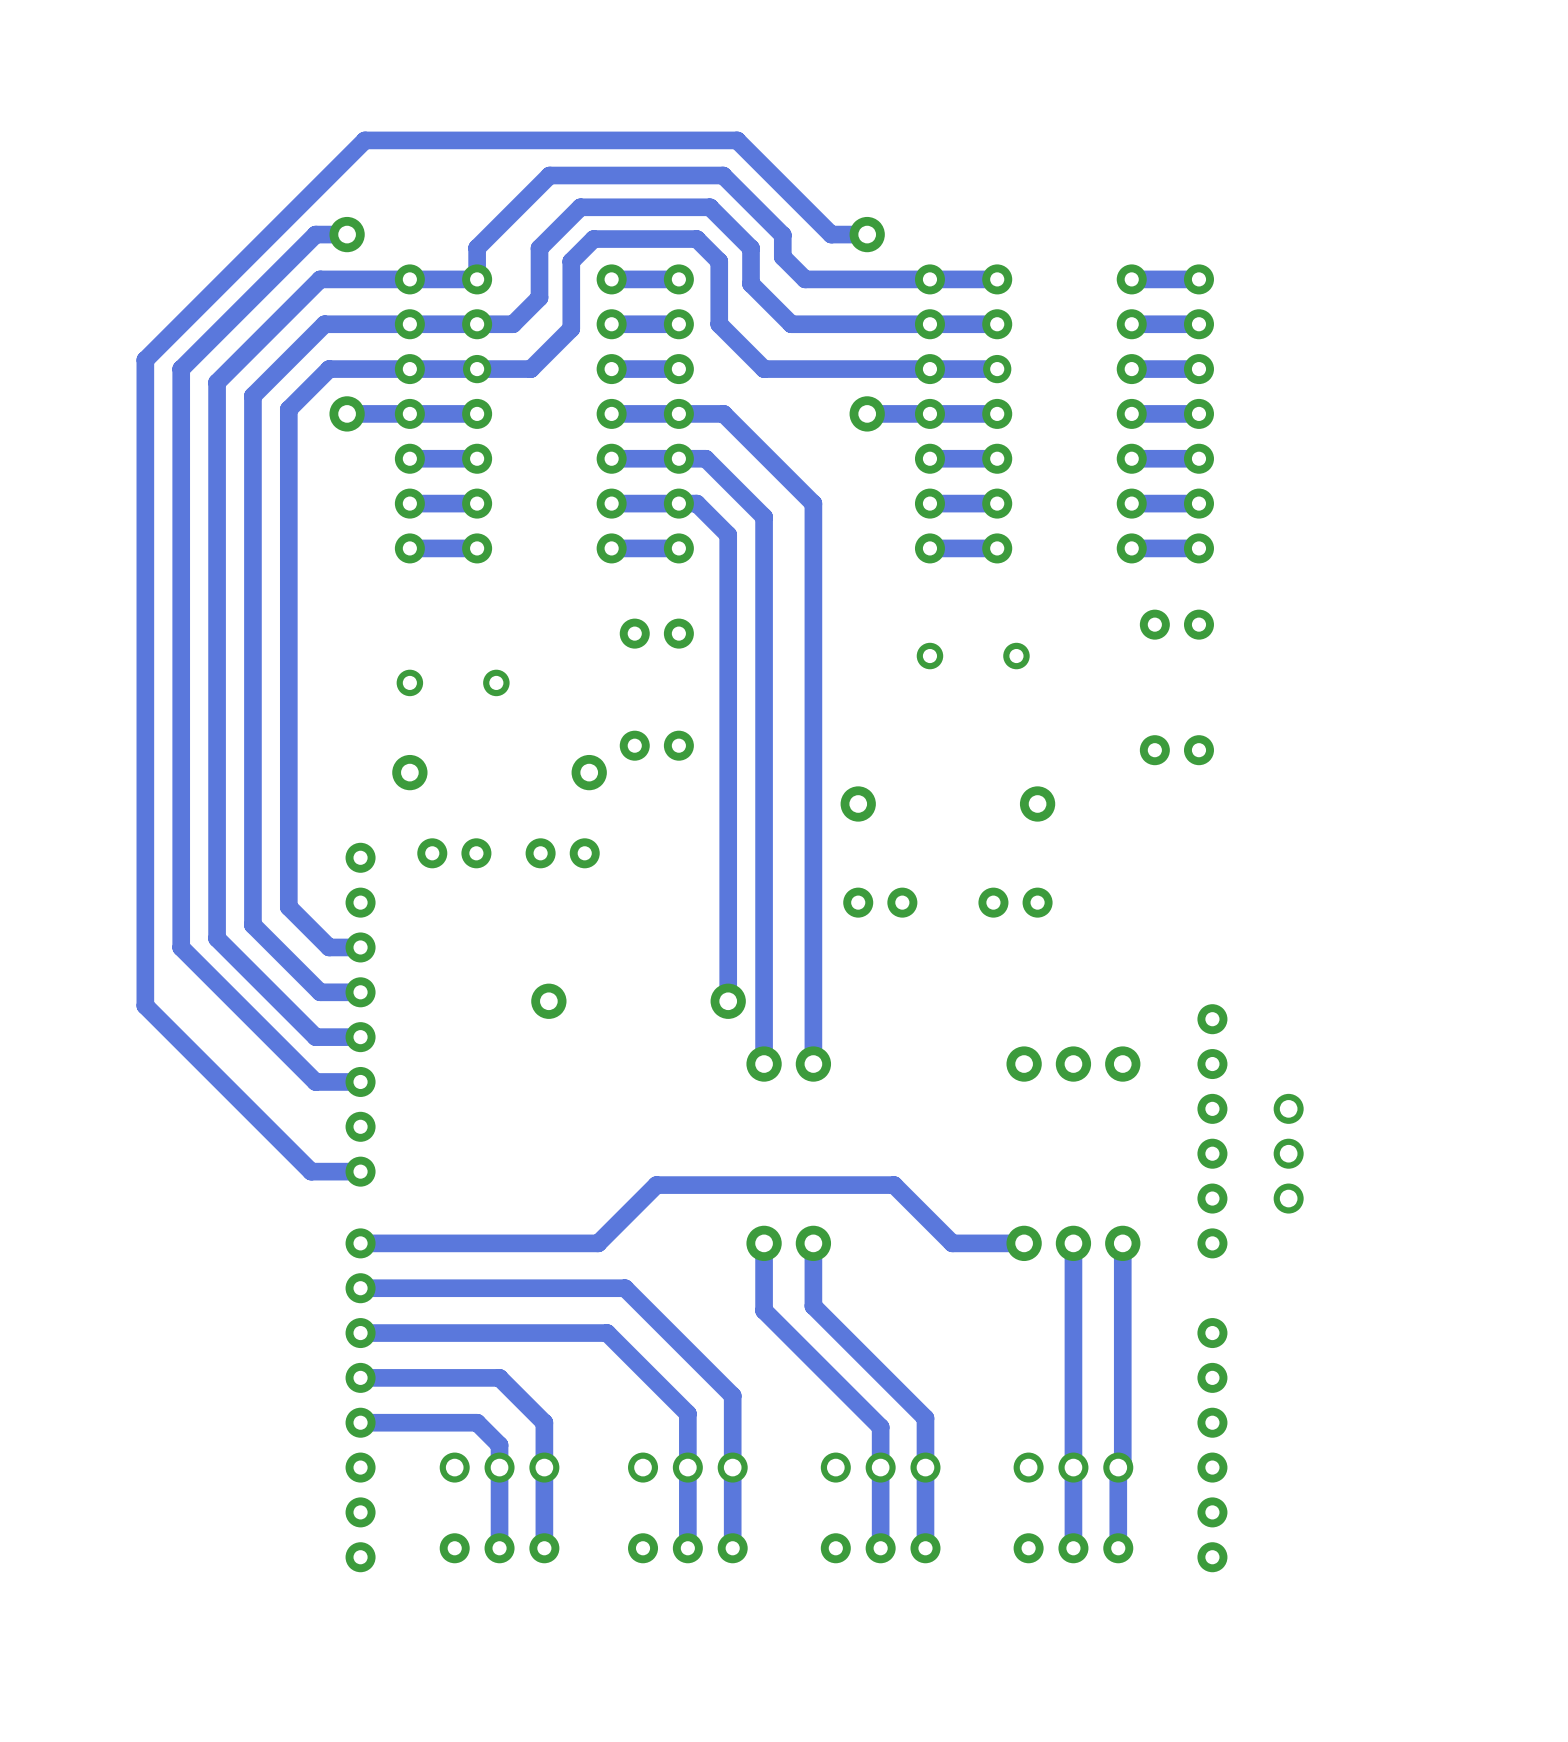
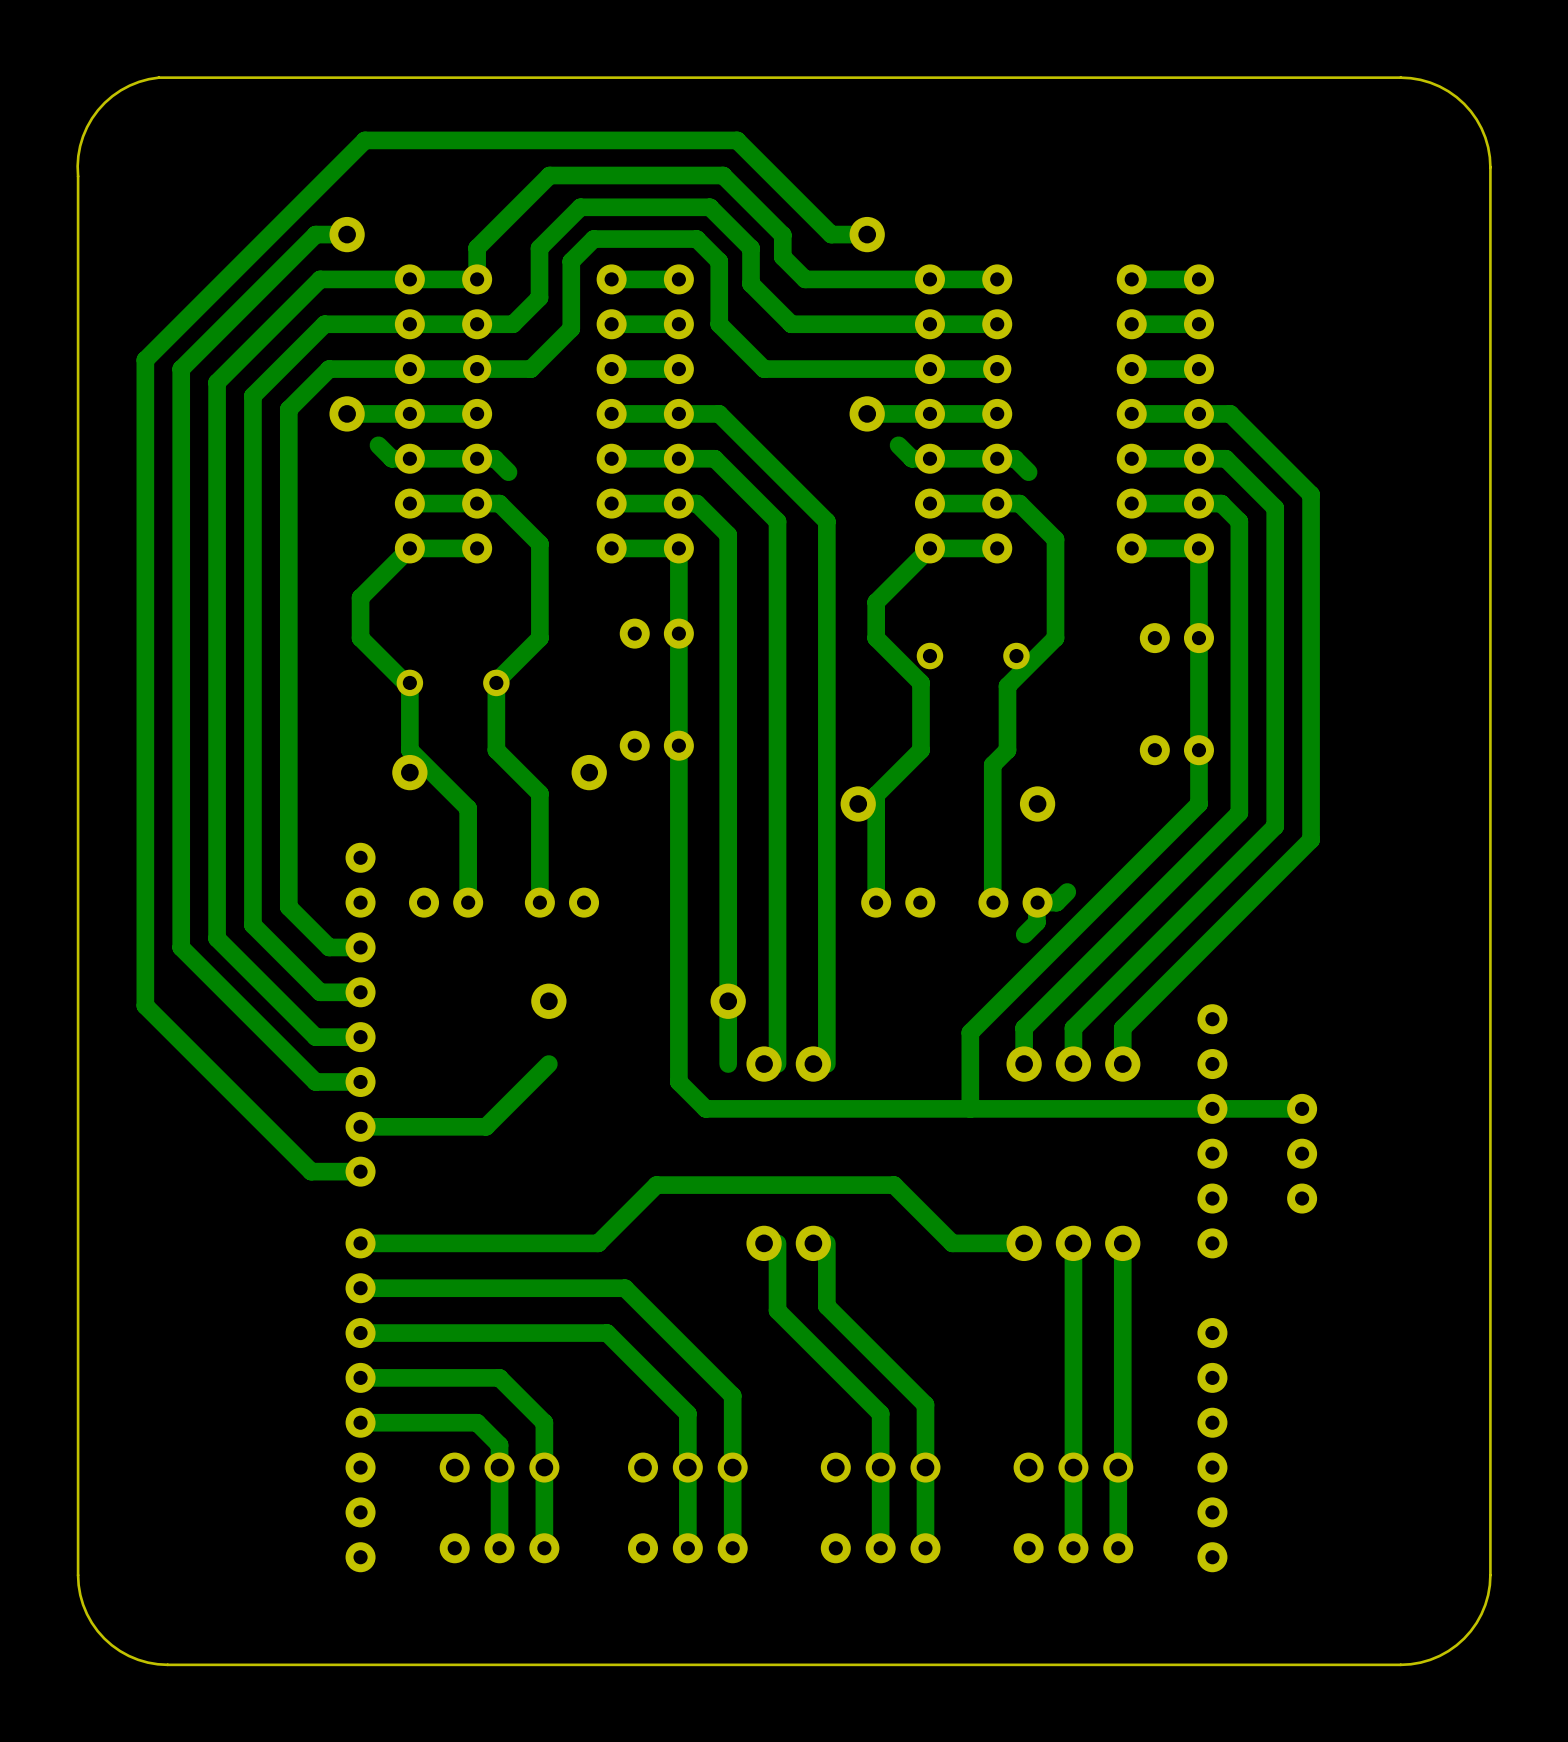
board edge: none -> (1400, 77) (158, 77) (129, 85) (112, 96) (98, 110) (83, 136) (77, 166) (78, 1575) (80, 1595) (86, 1614) (97, 1631) (111, 1645) (138, 1659) (167, 1664) (1400, 1664) (1420, 1662) (1439, 1655) (1456, 1645) (1470, 1631) (1485, 1604) (1490, 1575) (1490, 167) (1485, 137) (1476, 119) (1464, 103) (1439, 86) (1420, 79) (1400, 77)
bottom track: (719, 413) (723, 413) (813, 503) (813, 1064) -> (719, 413) (826, 521) (826, 1064)
bottom track: none -> (1198, 413) (1230, 413) (1311, 494) (1311, 839) (1122, 1028) (1122, 1064)
bottom track: none -> (378, 445) (391, 458) (409, 458)
bottom track: none -> (898, 445) (912, 458) (929, 458)
bottom track: none -> (477, 458) (495, 458) (508, 472)
bottom track: (705, 458) (764, 517) (764, 1064) -> (705, 458) (714, 458) (777, 521) (777, 1064)
bottom track: none -> (997, 458) (1015, 458) (1028, 472)
bottom track: none -> (1198, 458) (1225, 458) (1275, 508) (1275, 826) (1073, 1028) (1073, 1064)
bottom track: none -> (477, 503) (499, 503) (539, 543) (539, 638) (496, 681) (496, 750) (539, 793) (539, 902)
bottom track: none -> (997, 503) (1019, 503) (1055, 539) (1055, 638) (1007, 686) (1007, 750) (992, 764) (992, 902)
bottom track: none -> (1198, 503) (1221, 503) (1239, 521) (1239, 812) (1024, 1028) (1024, 1064)
bottom track: none -> (409, 548) (360, 597) (360, 638) (409, 687) (409, 750) (468, 808) (468, 902)
bottom track: none -> (678, 548) (678, 1081) (705, 1108) (1302, 1108)
bottom track: none -> (929, 548) (876, 602) (876, 638) (921, 682) (921, 750) (876, 795) (876, 902)
bottom track: none -> (1198, 548) (1198, 803) (970, 1032) (970, 1108)
part position: (1176, 624) -> (1176, 638)
part position: (454, 853) -> (446, 902)
part position: (562, 853) -> (561, 902)
bottom track: none -> (1067, 891) (1056, 902) (1036, 902) (1036, 922) (1024, 934)
part position: (880, 902) -> (898, 902)
bottom track: none -> (728, 1001) (728, 1064)
bottom track: none -> (548, 1064) (486, 1126) (360, 1126)
part footprint: [1273, 1093, 1304, 1214] -> [1287, 1093, 1318, 1214]
bottom track: (764, 1243) (764, 1310) (880, 1427) -> (777, 1243) (777, 1310) (880, 1413) (880, 1427)
bottom track: (813, 1243) (813, 1306) (925, 1418) -> (826, 1243) (826, 1306) (925, 1404) (925, 1418)

